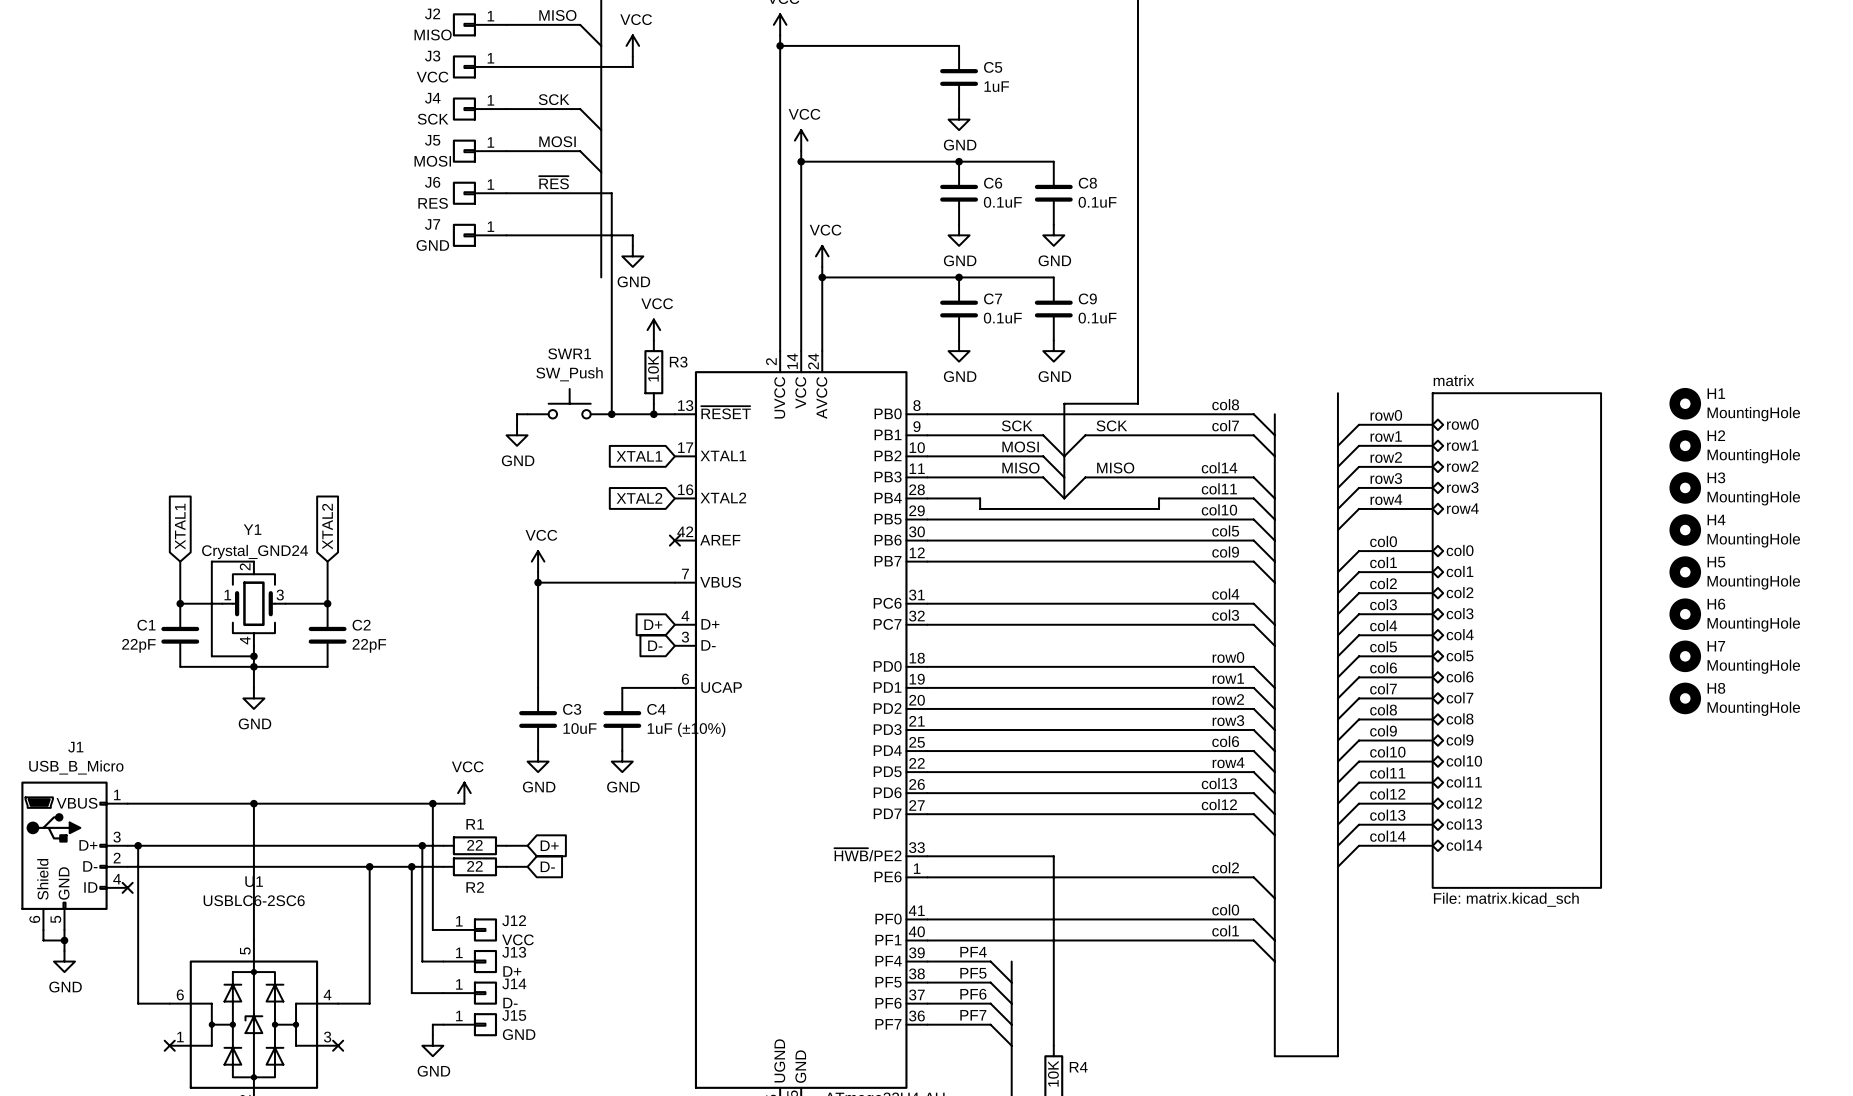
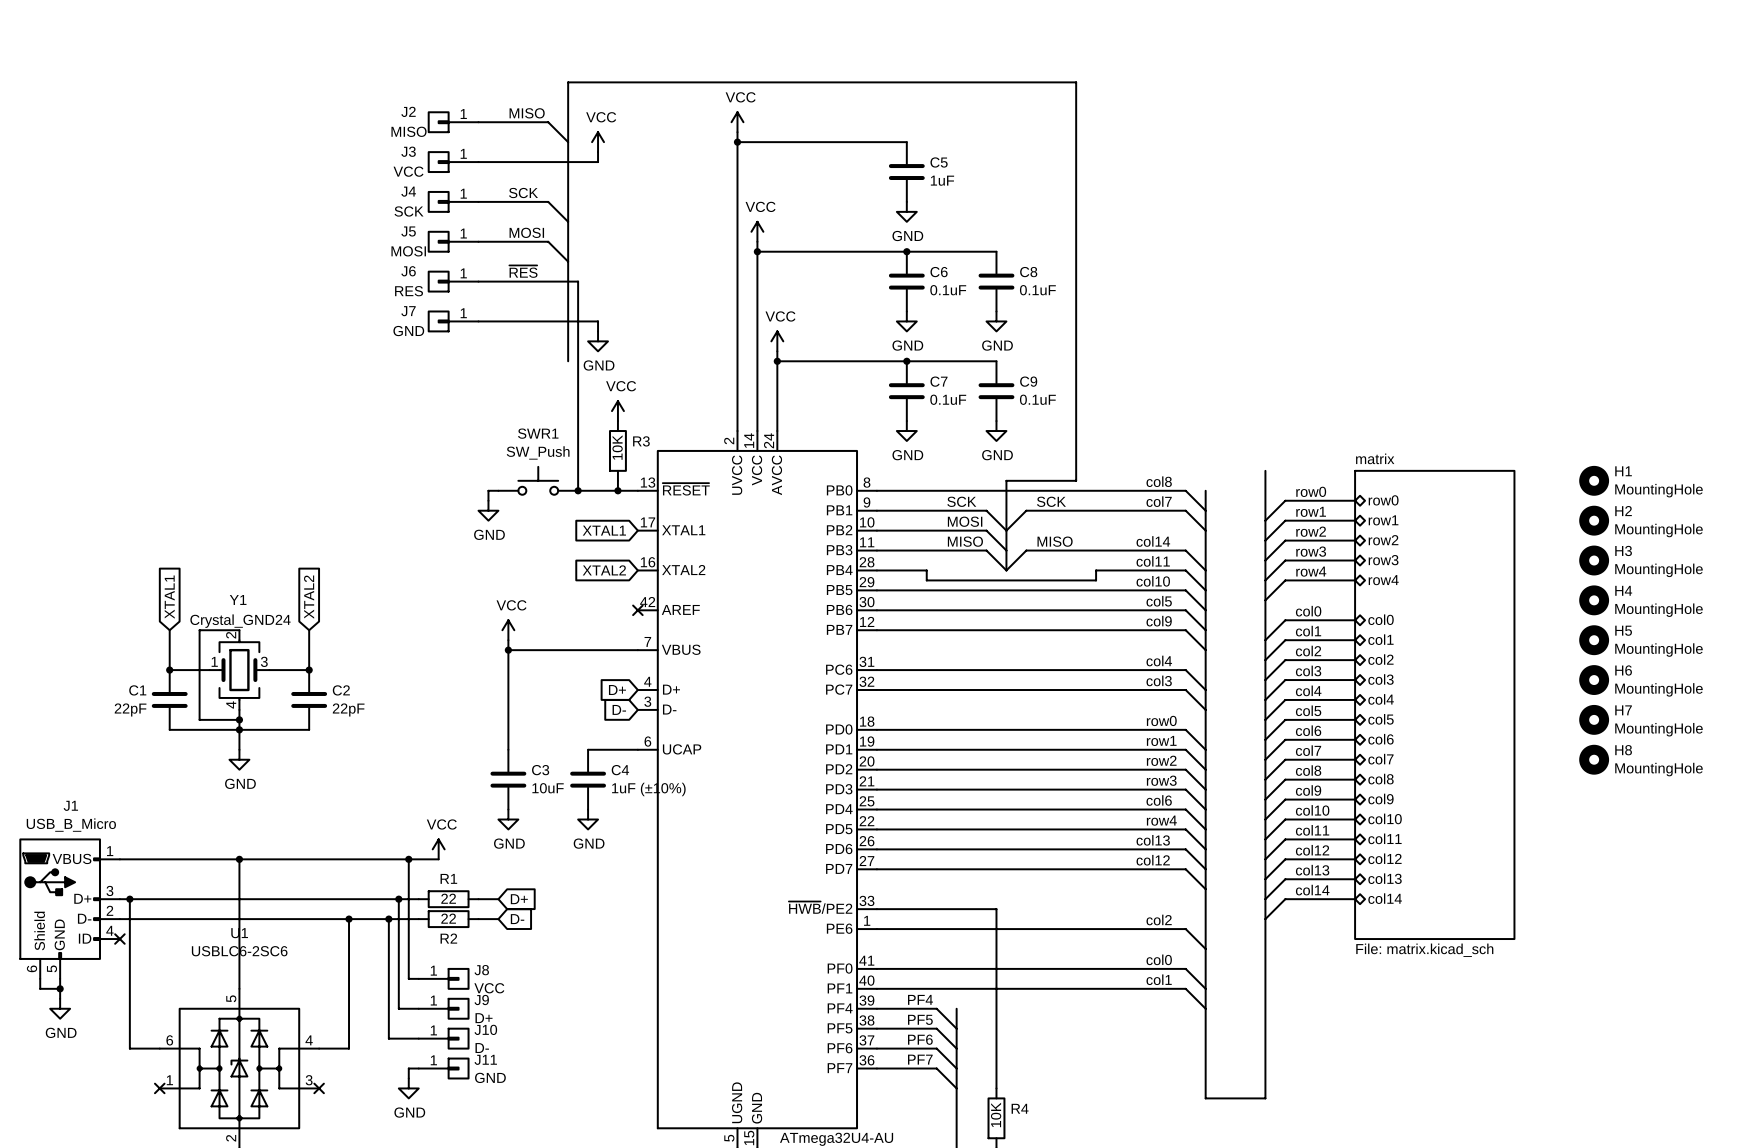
J12 name: J12 (514, 920) -> J8 (481, 970)
J13 name: J13 (514, 952) -> J9 (481, 1000)
J14 name: J14 (514, 983) -> J10 (485, 1029)
J15 name: J15 (514, 1015) -> J11 (485, 1059)

